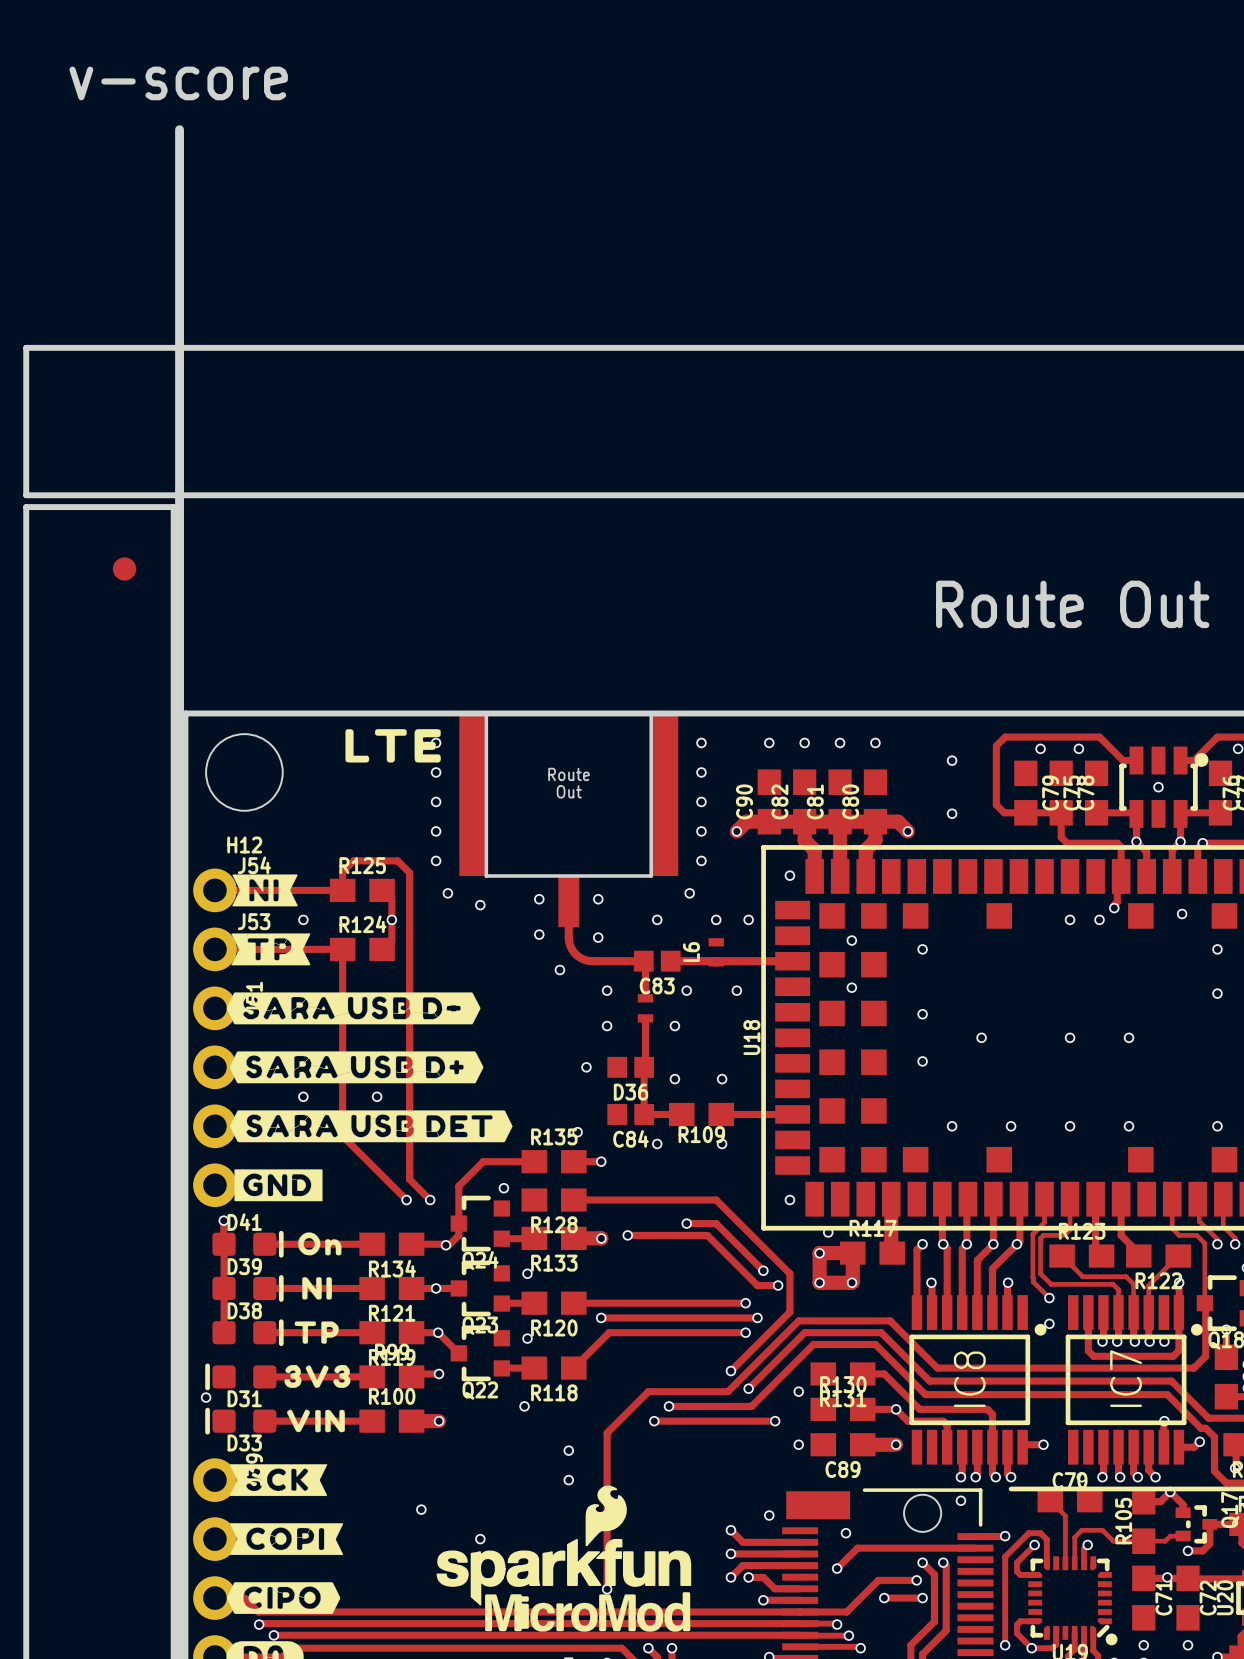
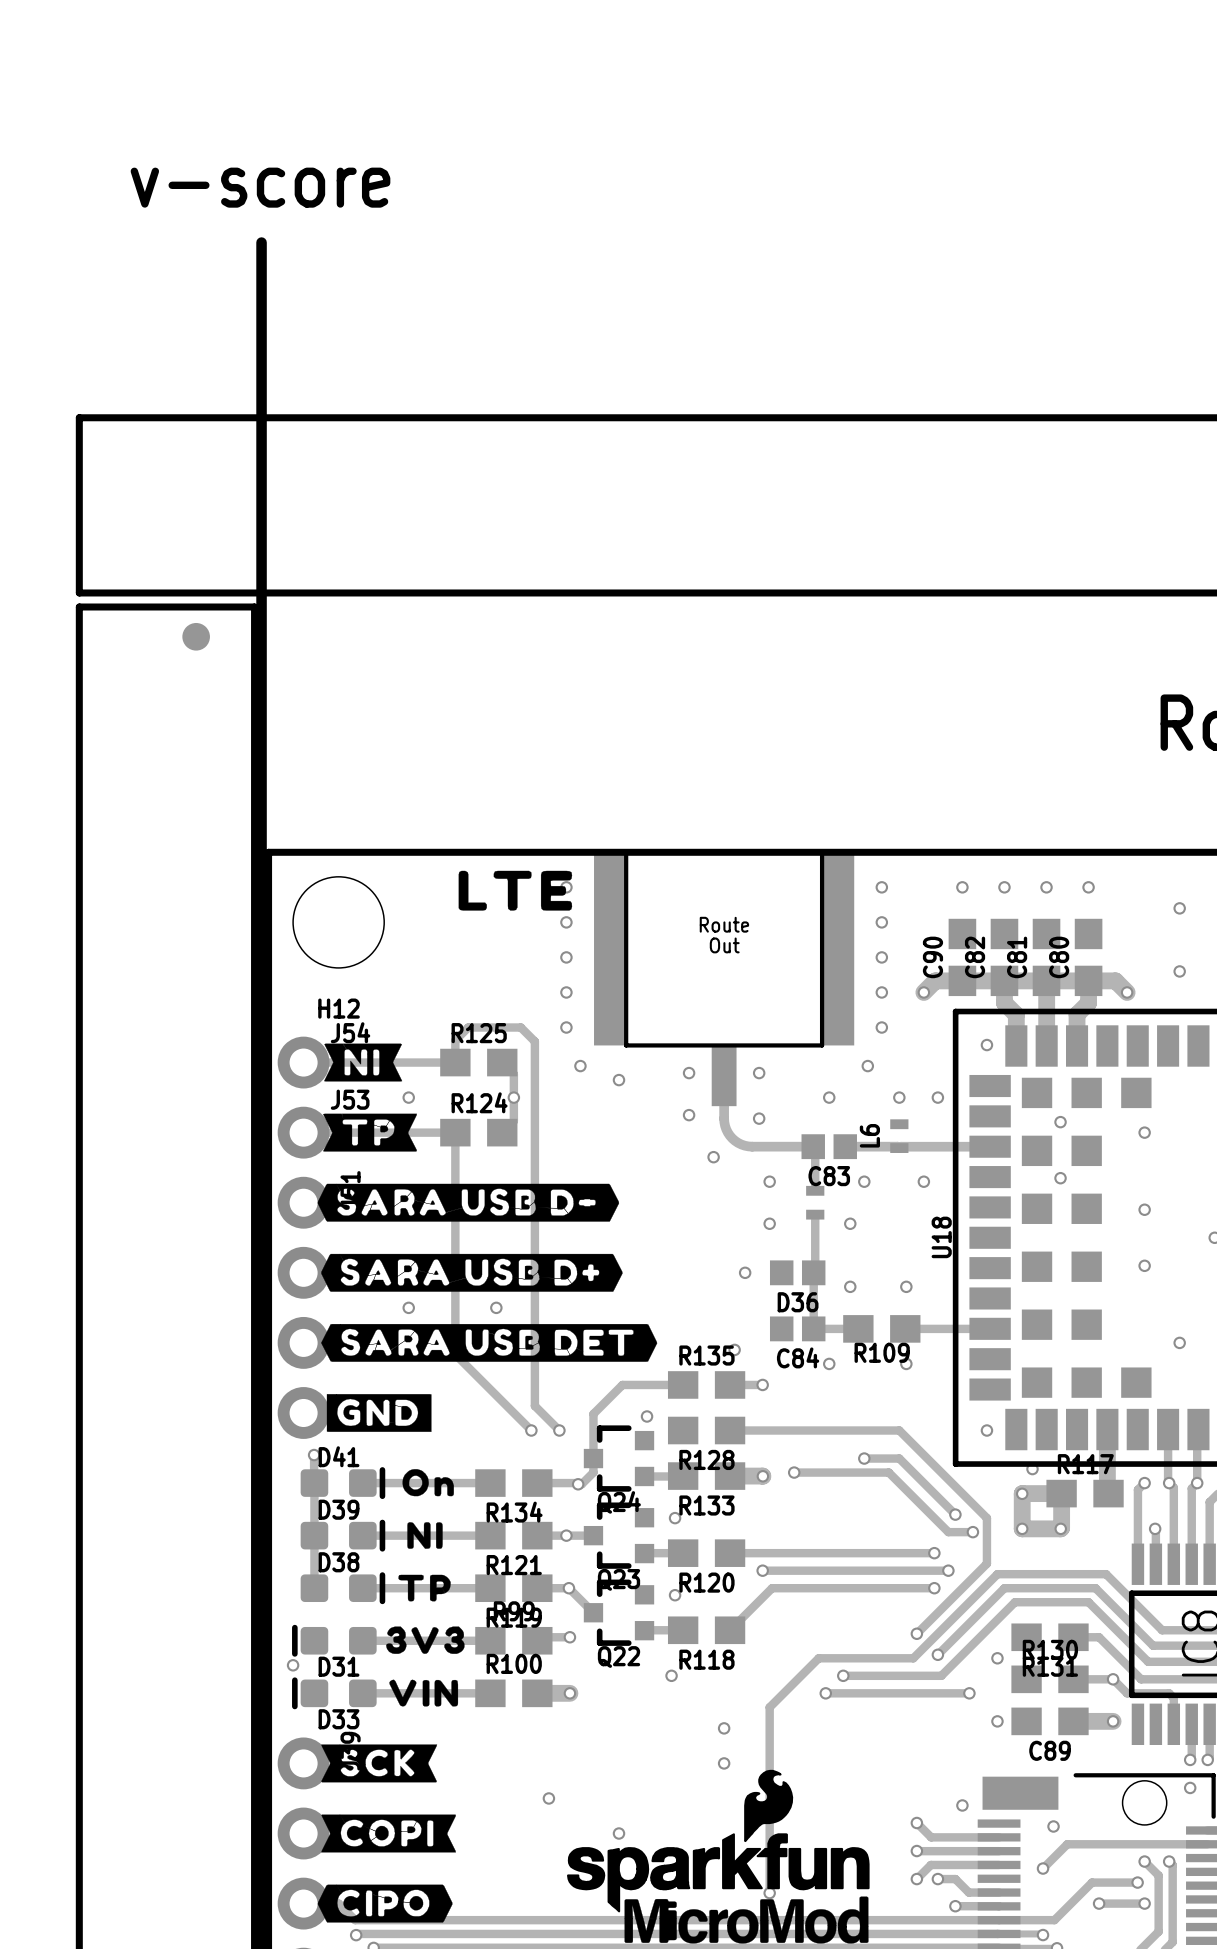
text position: v-score (178, 83) -> v-score (260, 187)
board edge: (179, 129) (179, 200) -> none
part position: (124, 568) -> (196, 636)

